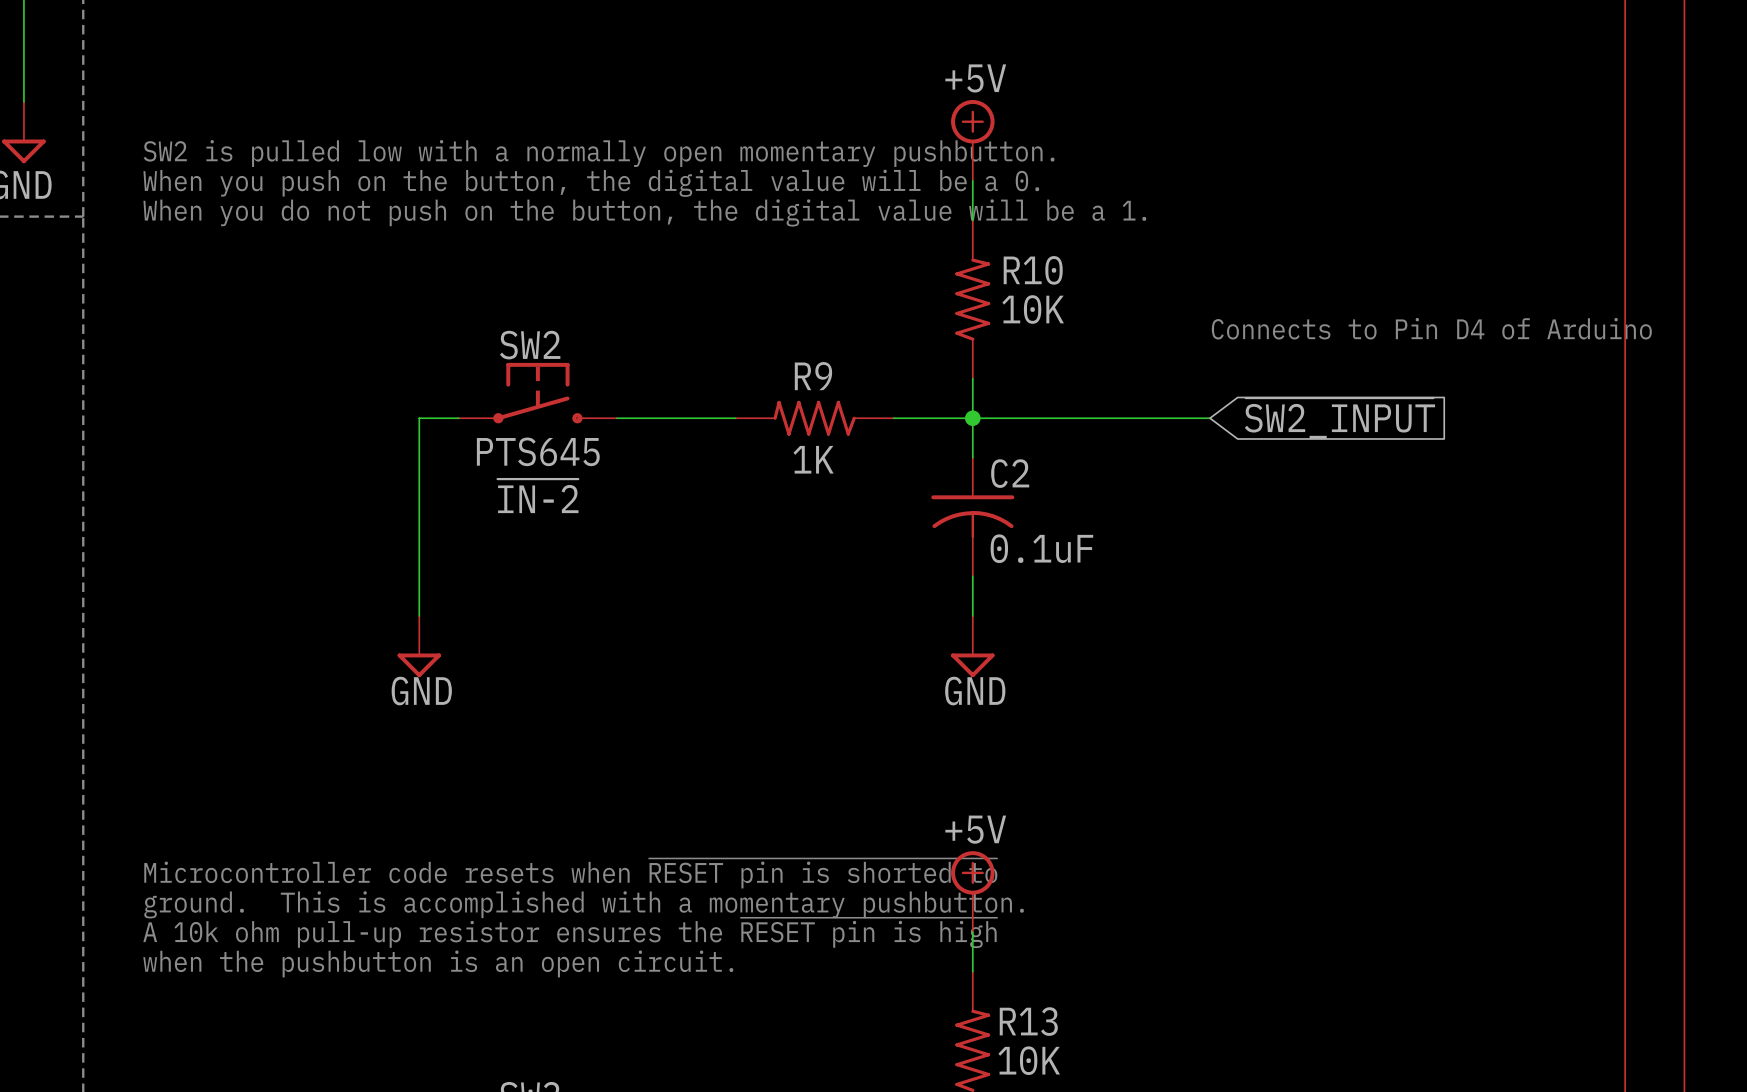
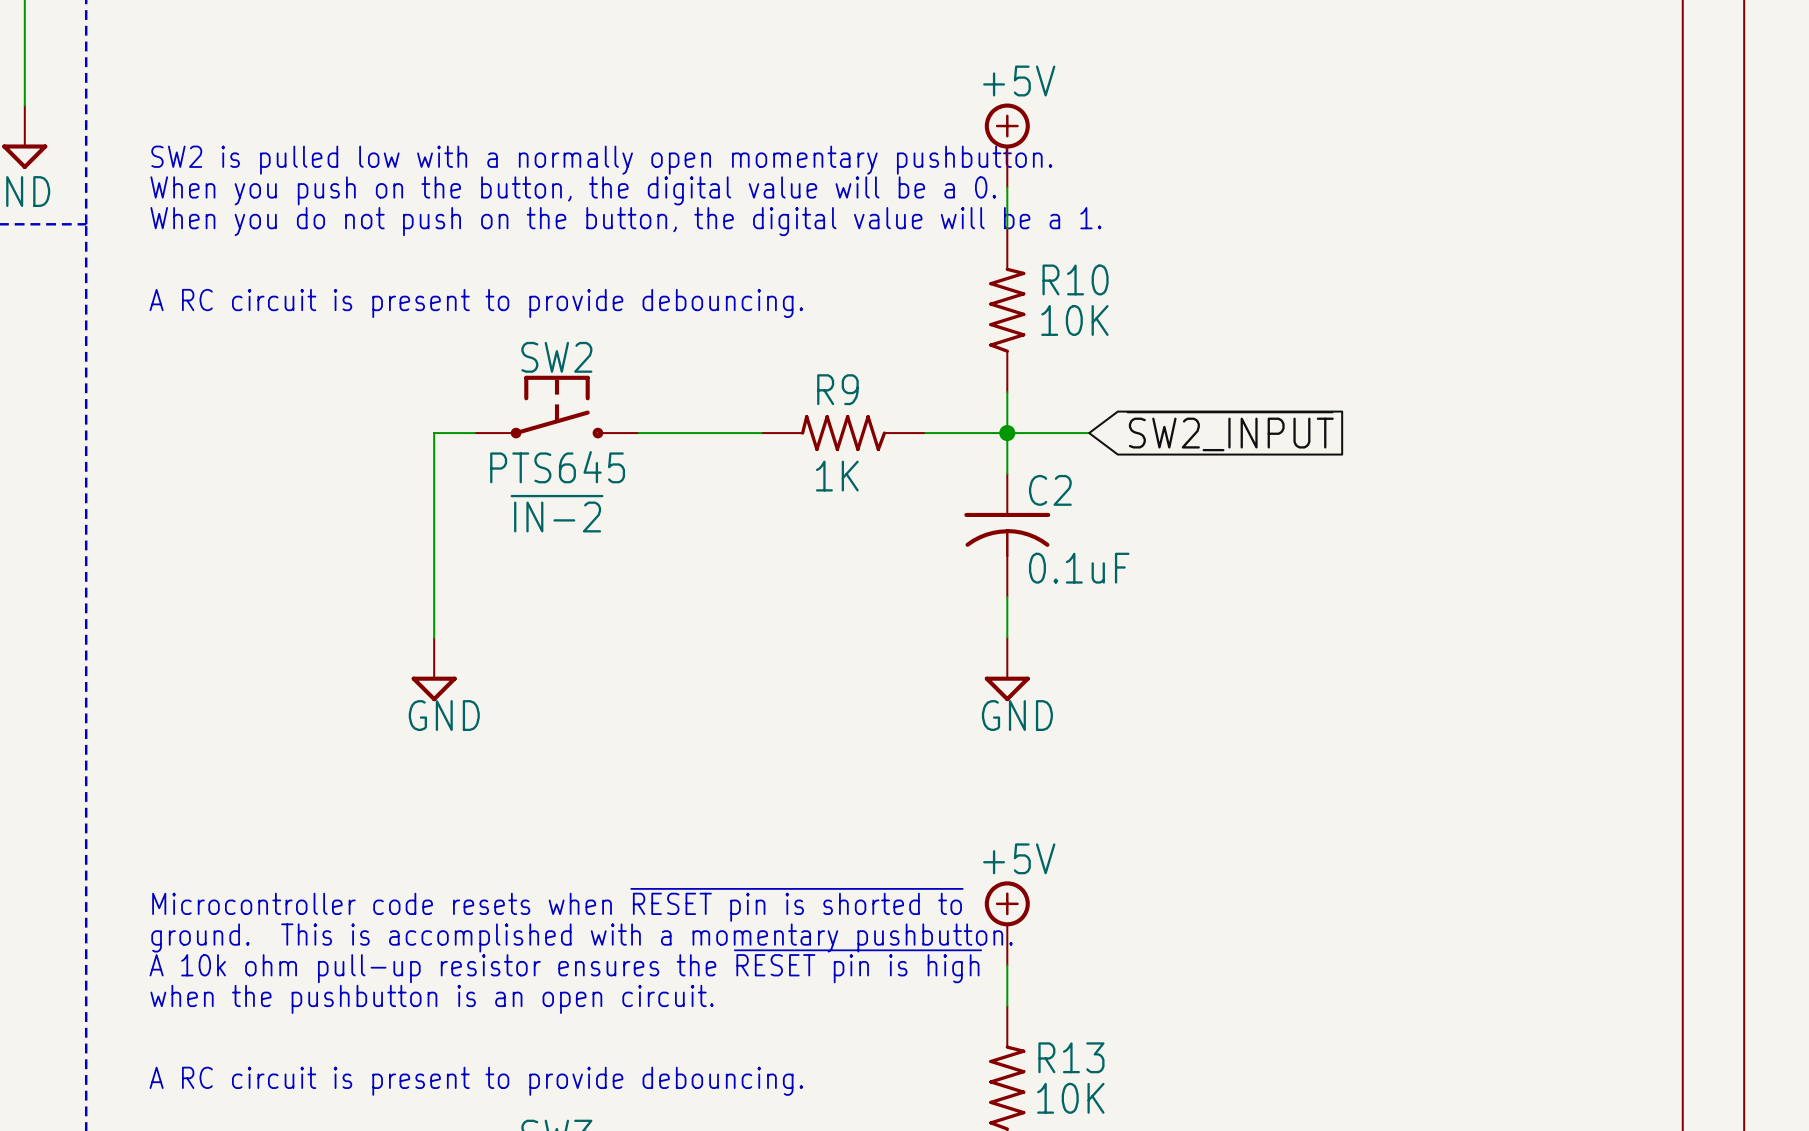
text: none -> A RC circuit is present to provide debouncing. (476, 303)
text: Connects to Pin D4 of Arduino (1431, 328) -> none
wire: (1051, 418) (1210, 418) -> none
global label position: ~{SW2_INPUT} (1339, 418) -> ~{SW2_INPUT} (1230, 431)
text: none -> A RC circuit is present to provide debouncing. (476, 1081)

